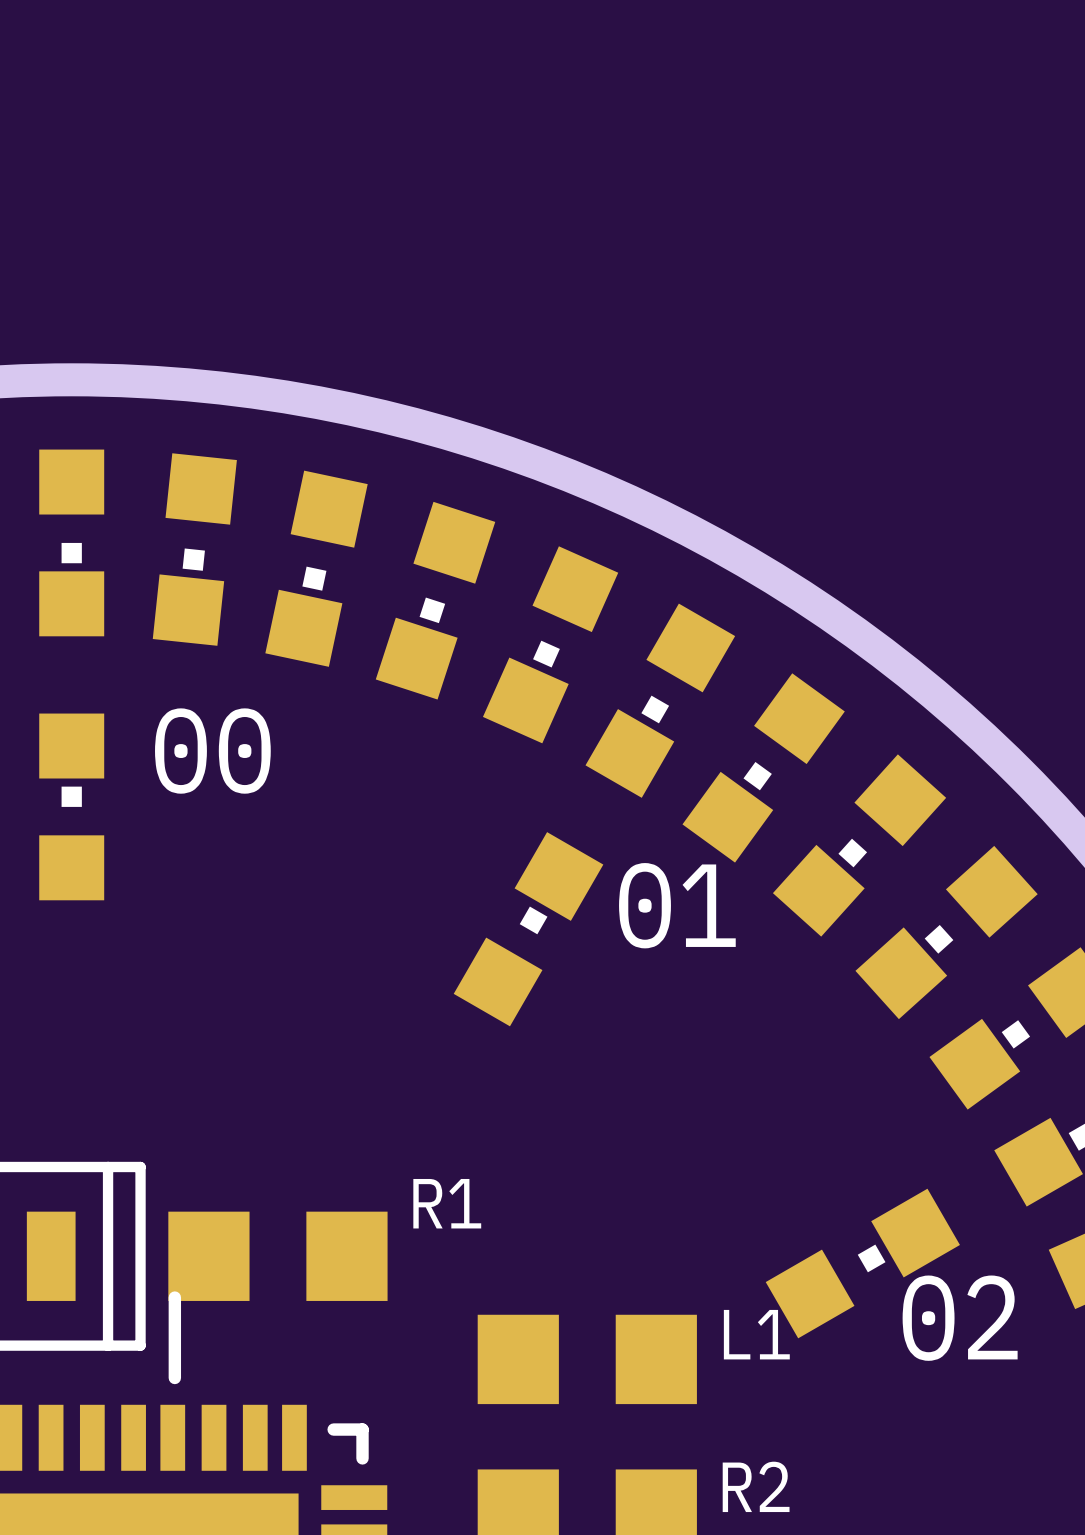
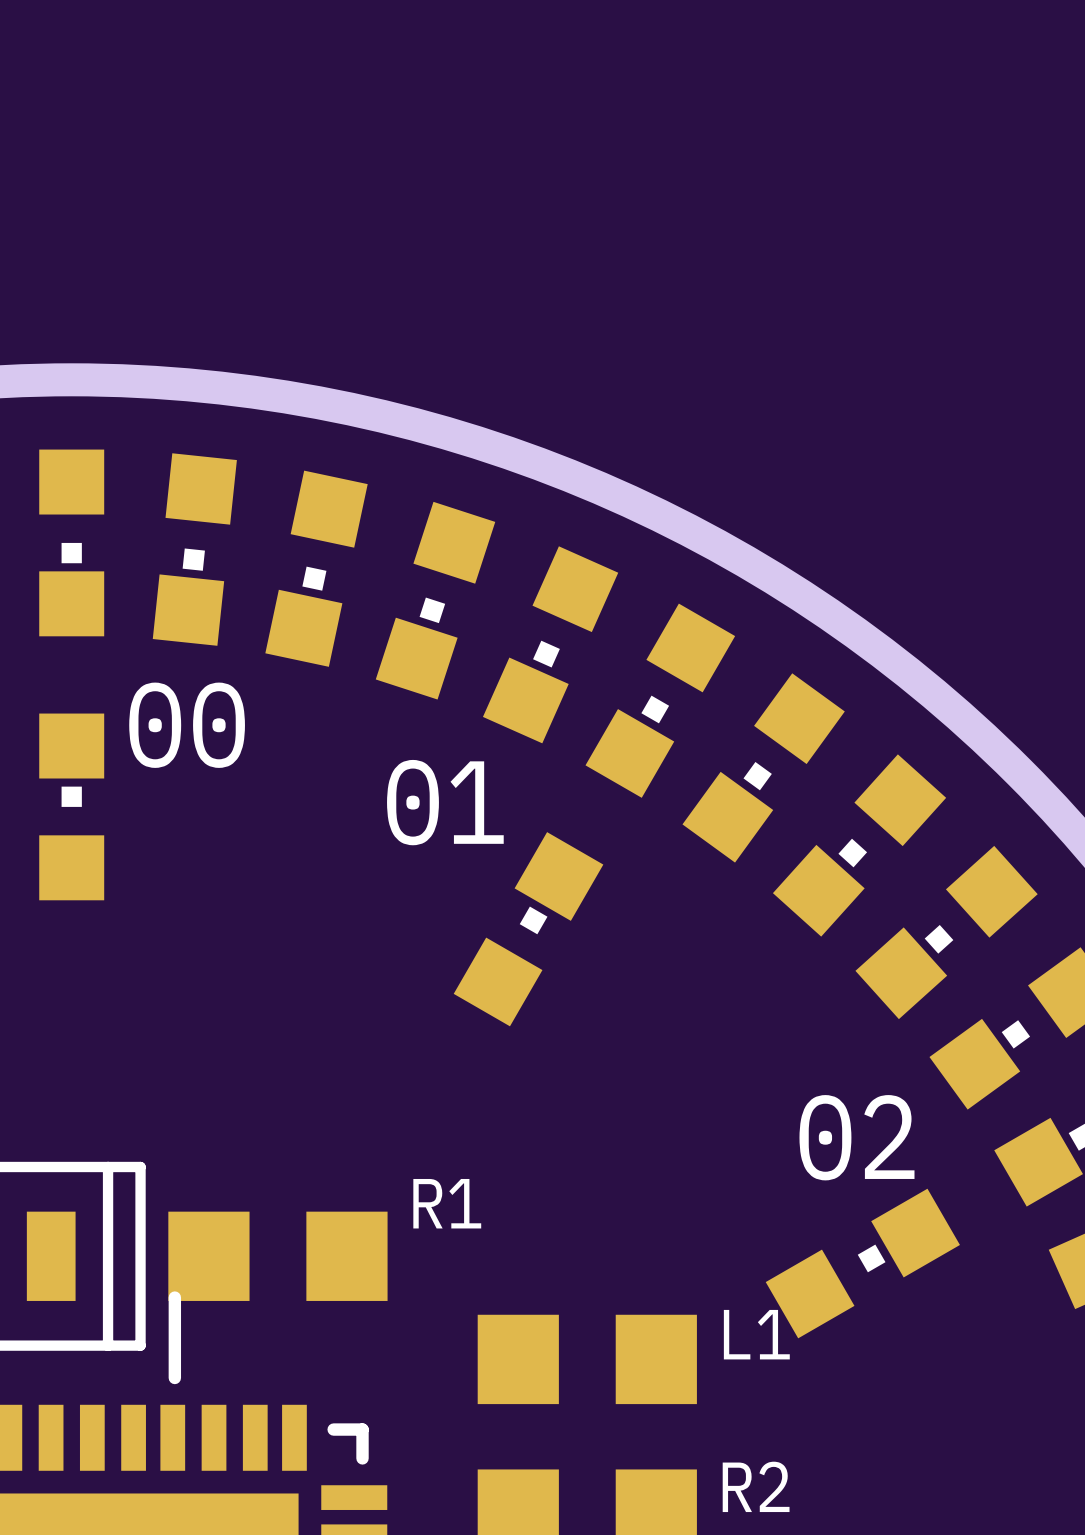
text position: 00 (212, 751) -> 00 (187, 725)
text position: 01 (677, 905) -> 01 (445, 802)
text position: 02 (960, 1318) -> 02 (856, 1137)

